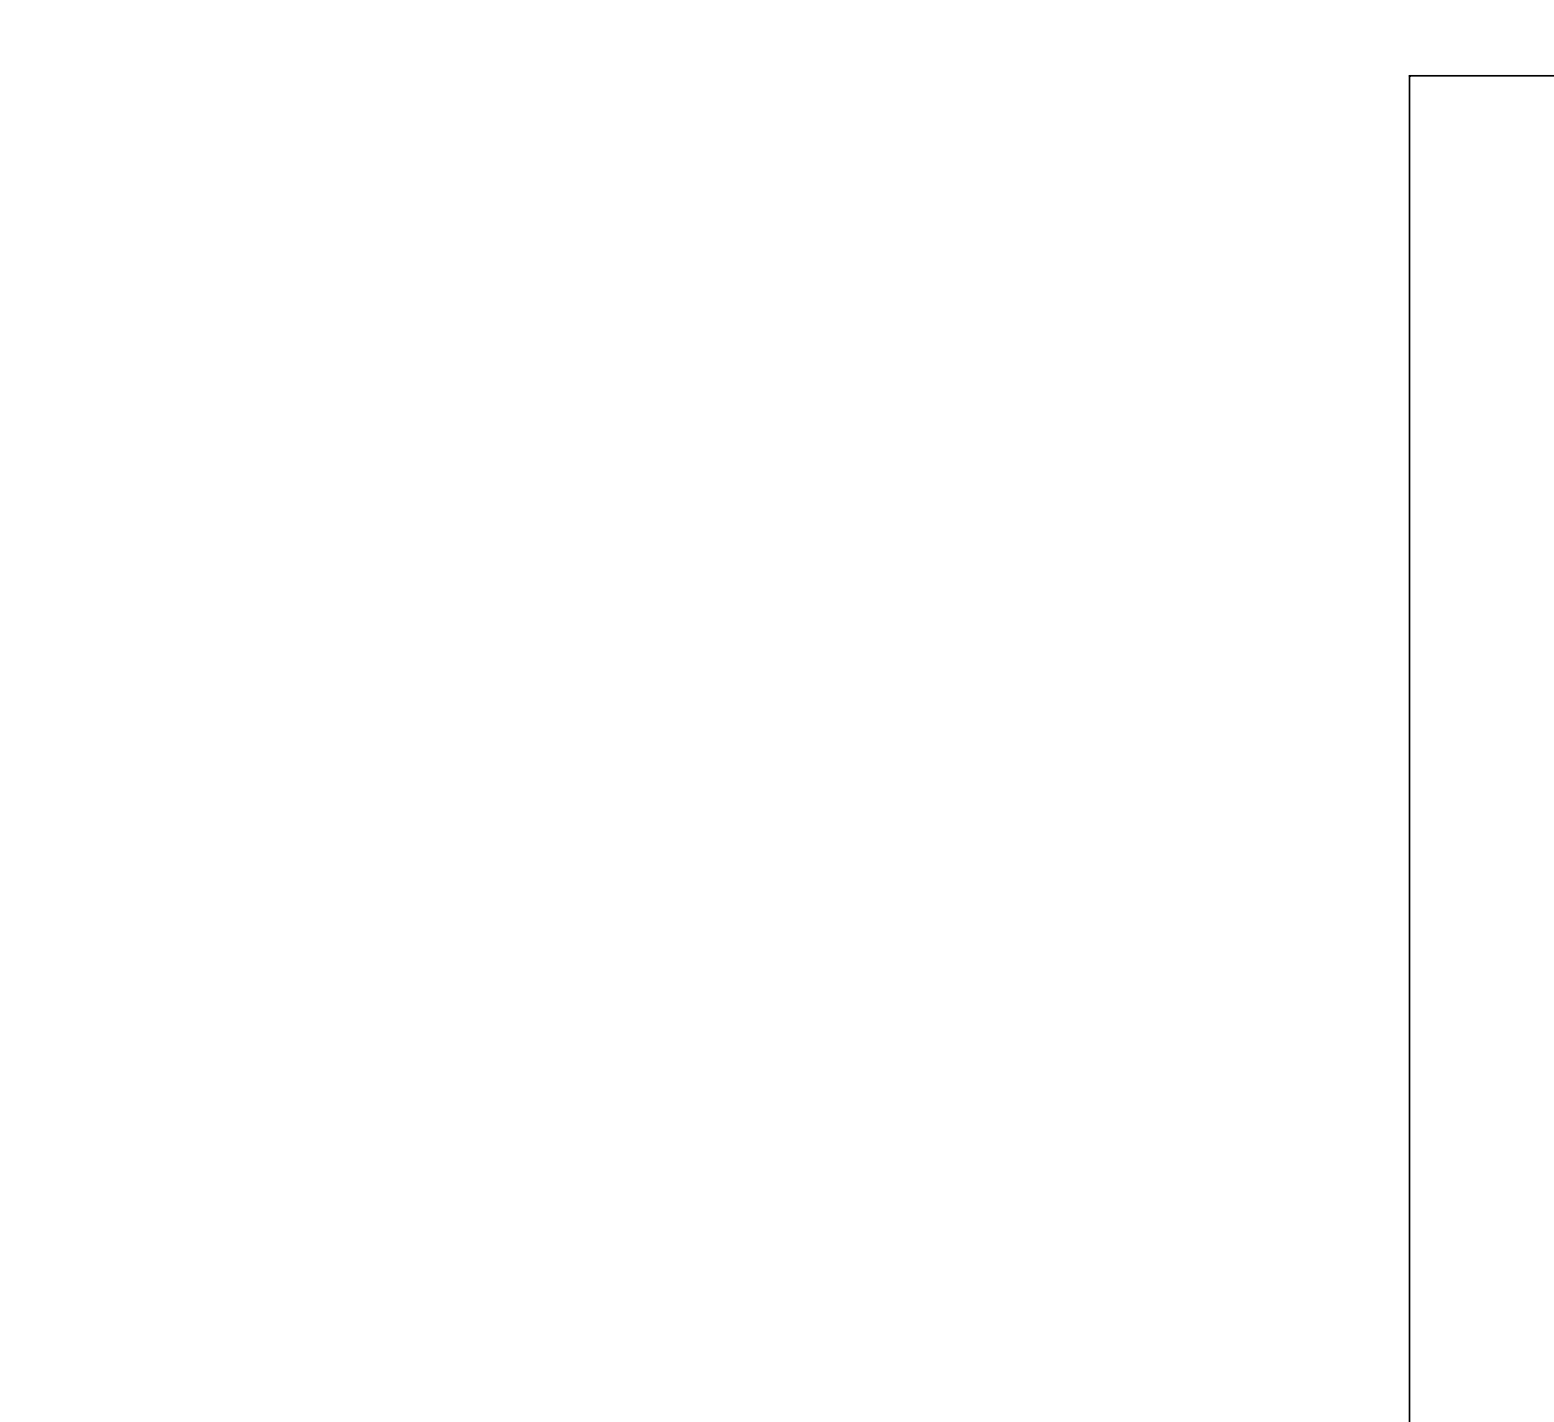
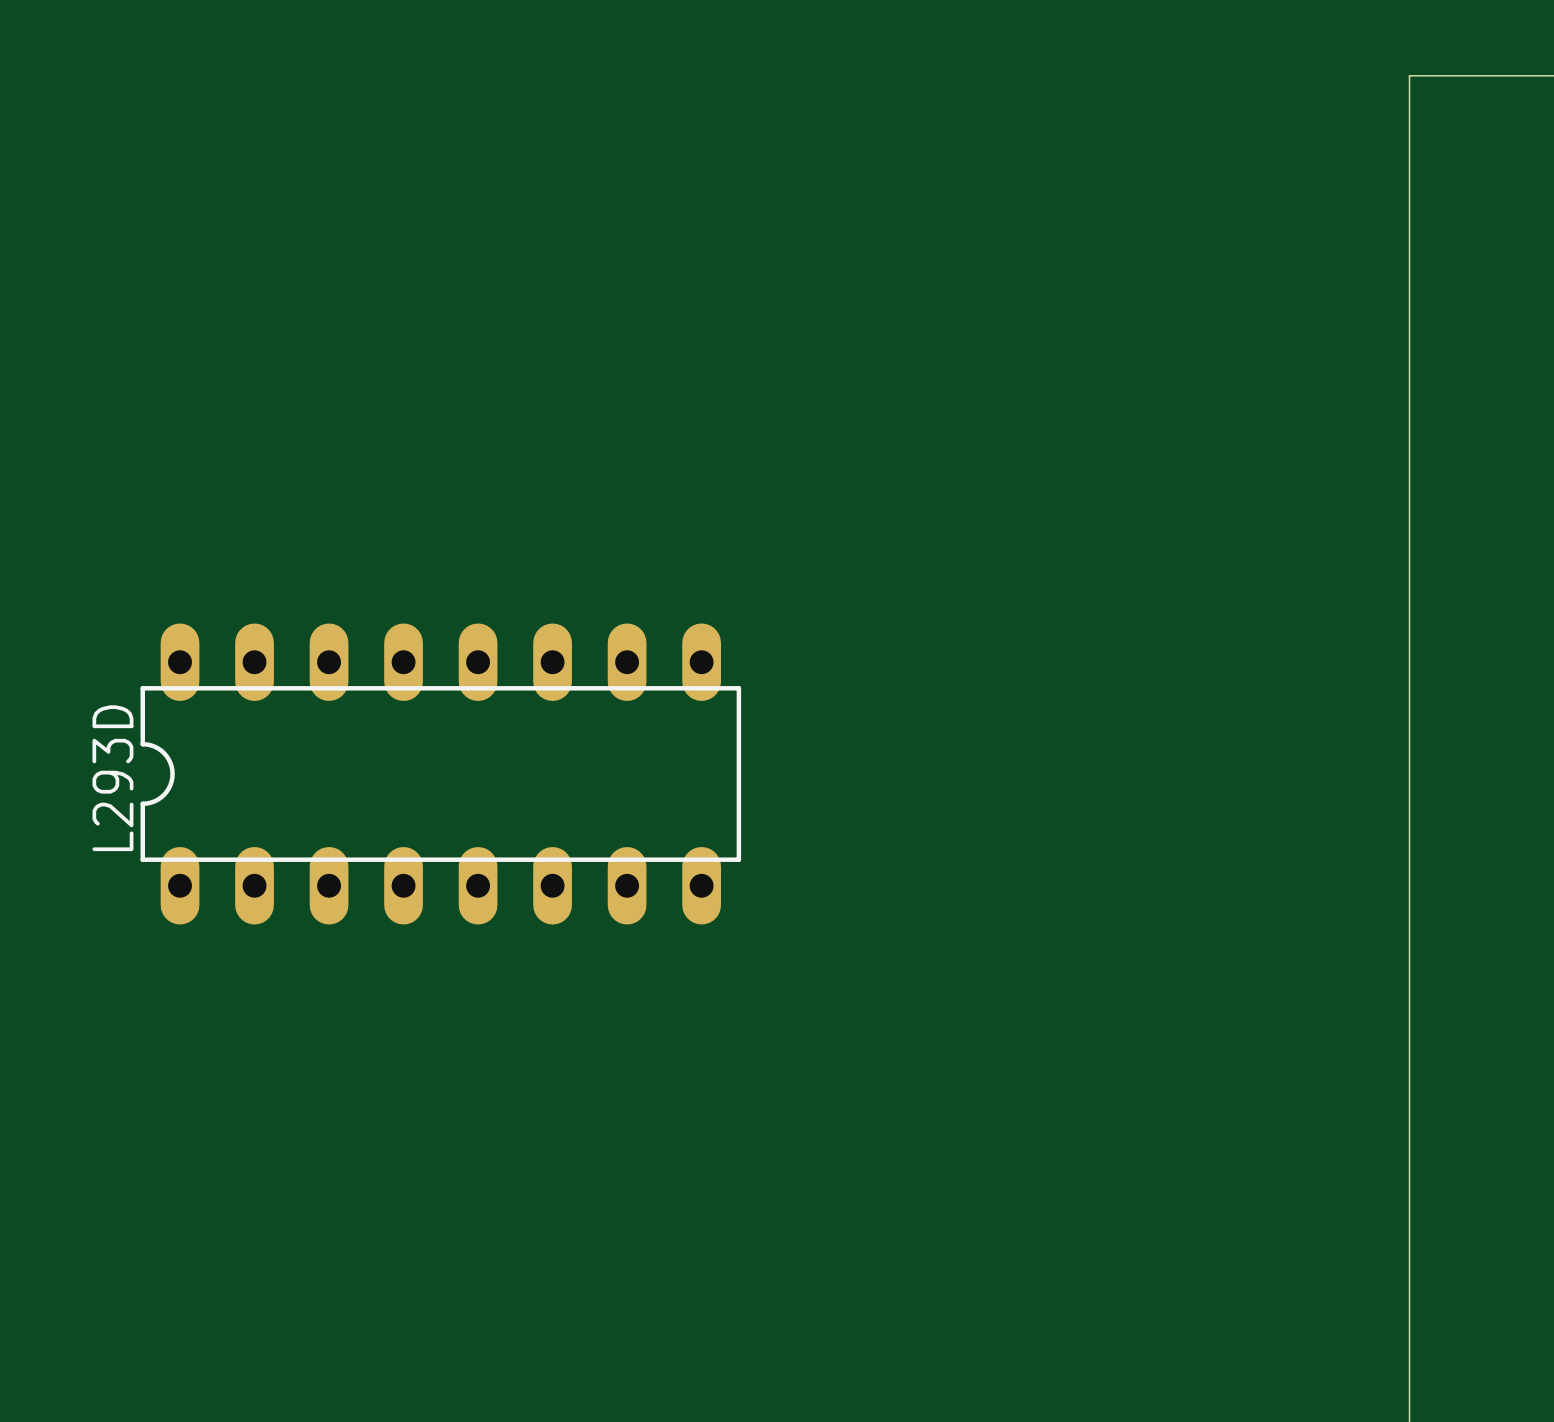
L293D: none -> (440, 773)

